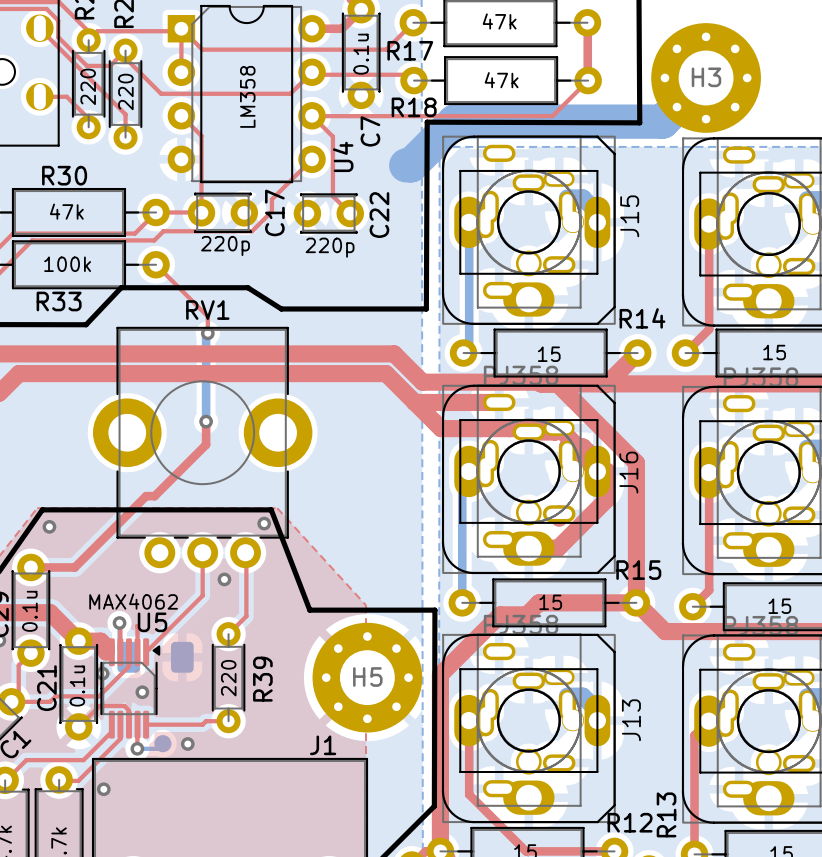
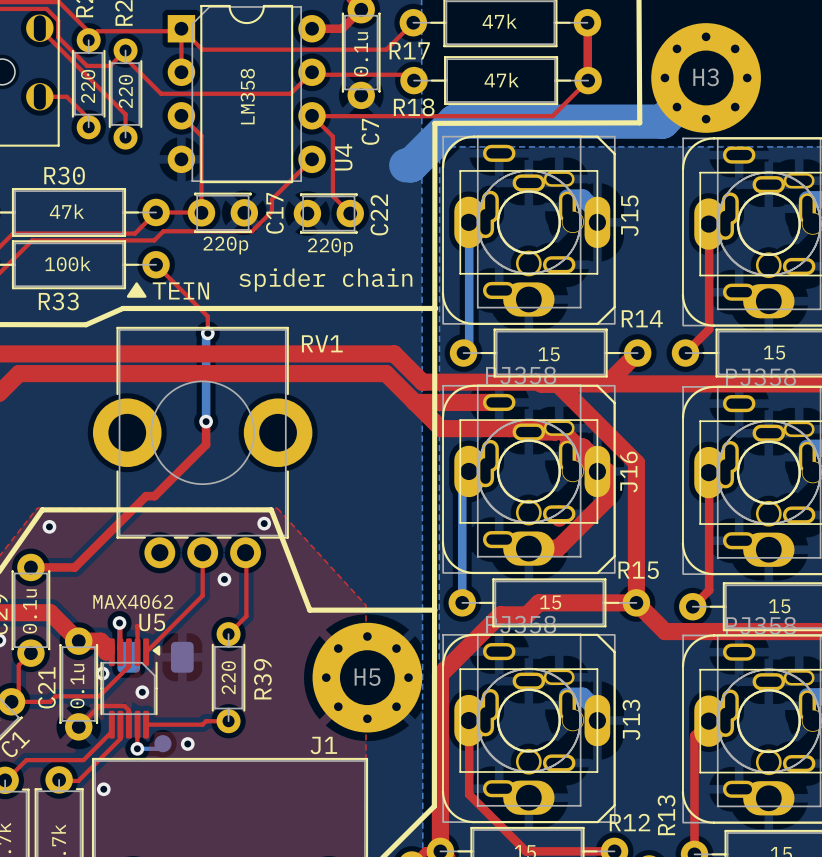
line: (639, 122) (427, 122) (426, 308) (281, 308) (247, 287) (121, 287) (86, 324) -> (435, 308) (122, 308) (86, 324)
text: none -> spider chain (325, 279)
drawing: none -> [126, 282, 147, 298]
text: none -> TEIN (180, 290)
RV1 name position: RV1 (207, 310) -> RV1 (322, 343)
line: (434, 610) (434, 806) -> (639, 122) (434, 123) (434, 806)

